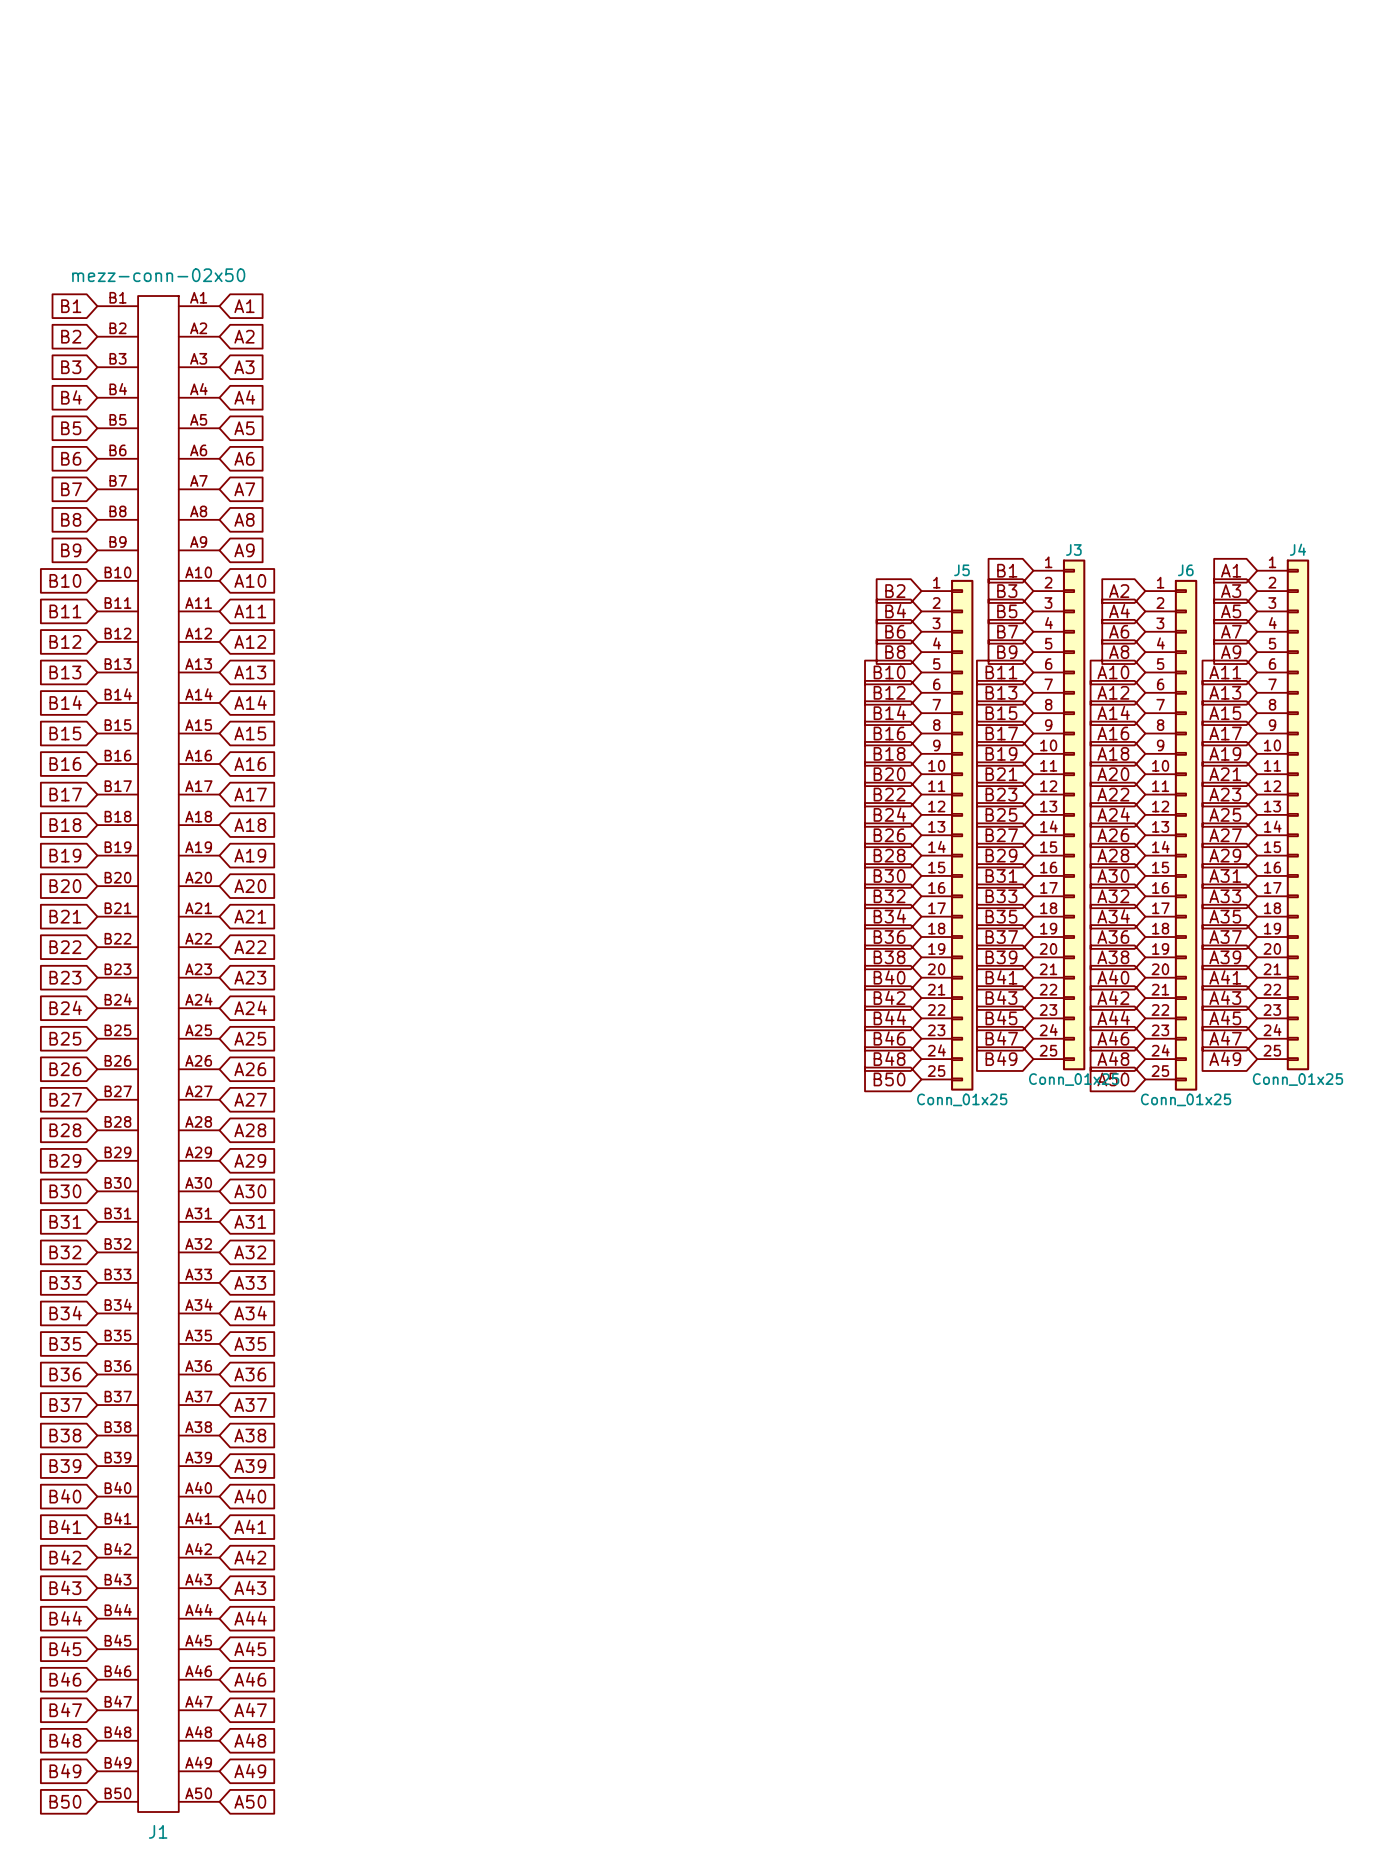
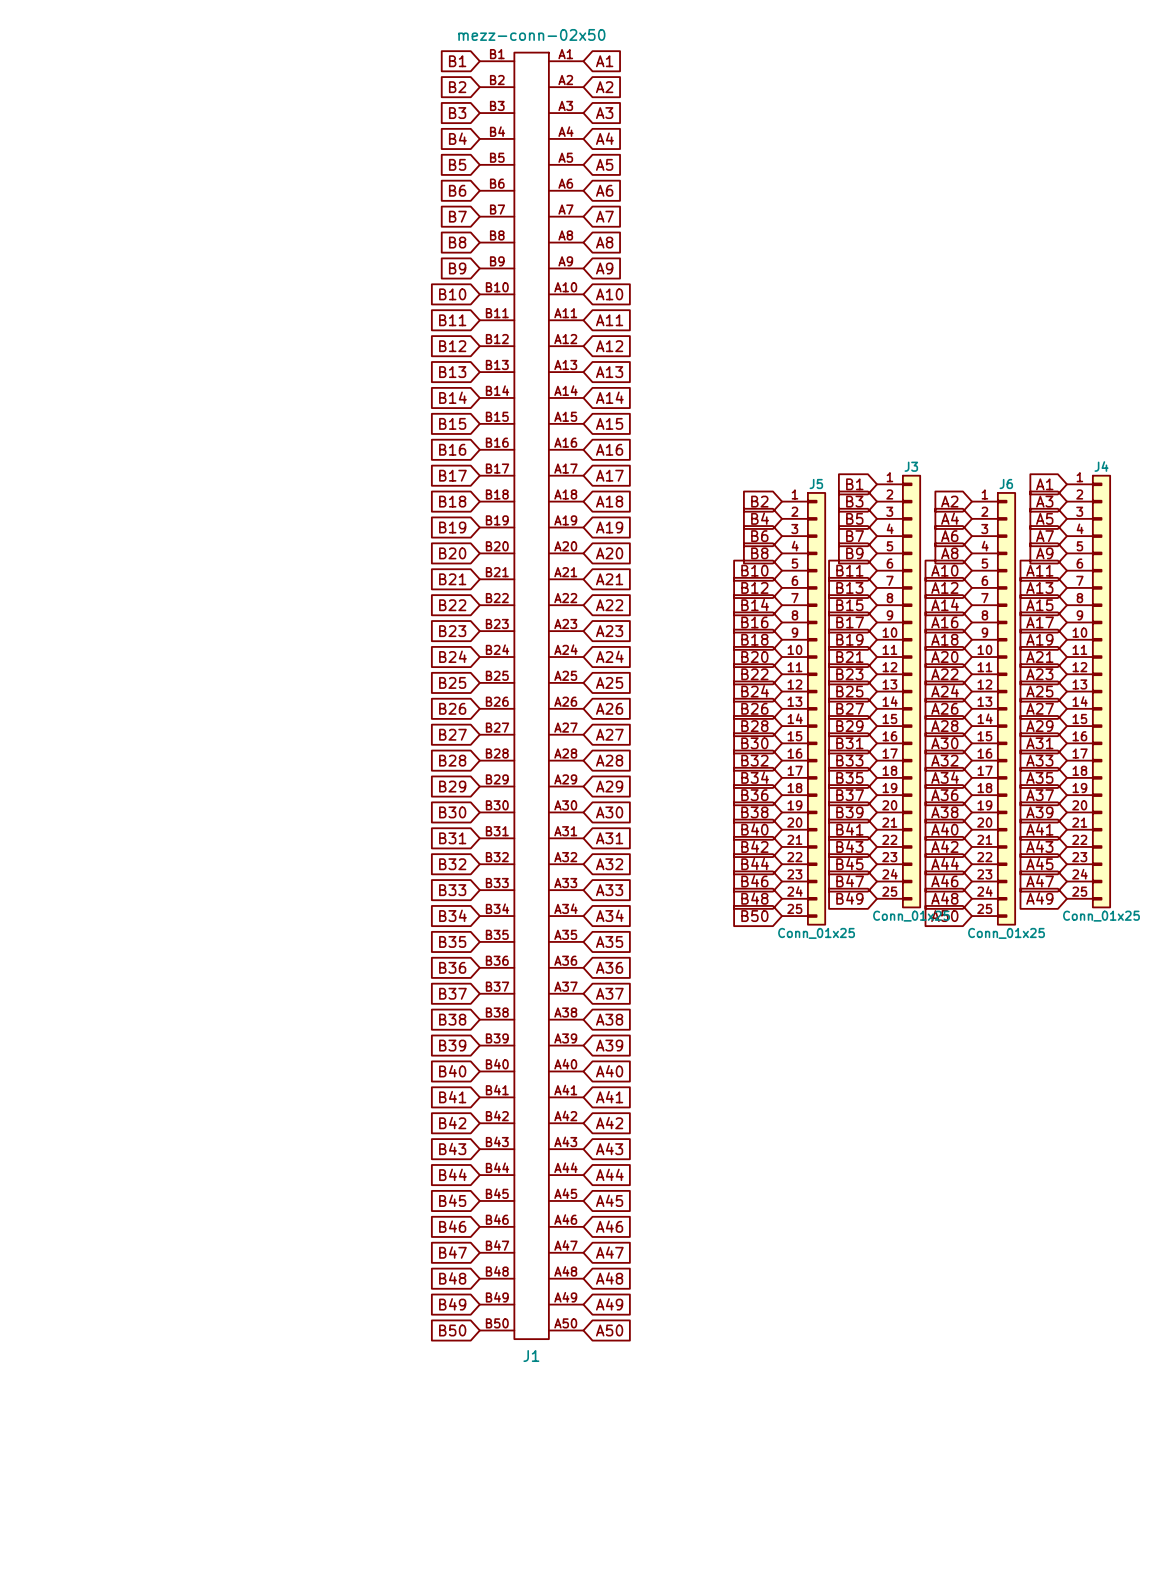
global label: none -> B1 (457, 61)
global label: none -> A1 (604, 61)
global label: none -> B2 (457, 87)
global label: none -> A2 (604, 87)
global label: none -> B3 (457, 113)
global label: none -> A3 (604, 113)
global label: none -> B4 (457, 138)
global label: none -> A4 (604, 138)
global label: none -> B5 (457, 164)
global label: none -> A5 (604, 164)
global label: none -> B6 (457, 190)
global label: none -> A6 (604, 190)
global label: none -> B7 (457, 216)
global label: none -> A7 (604, 216)
global label: none -> B8 (457, 242)
global label: none -> A8 (604, 242)
global label: B1 (71, 306) -> none
global label: A1 (244, 306) -> none
global label: none -> B9 (457, 268)
global label: none -> A9 (604, 268)
global label: B2 (71, 336) -> none
global label: A2 (244, 336) -> none
global label: none -> B10 (452, 294)
global label: none -> A10 (609, 294)
global label: B3 (71, 367) -> none
global label: A3 (244, 367) -> none
global label: none -> B11 (452, 320)
global label: none -> A11 (609, 320)
global label: B4 (71, 397) -> none
global label: A4 (244, 397) -> none
global label: none -> B12 (452, 346)
global label: none -> A12 (609, 346)
global label: B5 (71, 428) -> none
global label: A5 (244, 428) -> none
global label: none -> B13 (452, 372)
global label: none -> A13 (609, 372)
global label: B6 (71, 458) -> none
global label: A6 (244, 458) -> none
global label: none -> B14 (452, 397)
global label: none -> A14 (609, 397)
global label: B7 (71, 489) -> none
global label: A7 (244, 489) -> none
global label: none -> B15 (452, 423)
global label: none -> A15 (609, 423)
global label: B8 (71, 519) -> none
global label: A8 (244, 519) -> none
global label: none -> B16 (452, 449)
global label: none -> A16 (609, 449)
global label: B9 (71, 550) -> none
global label: A9 (244, 550) -> none
global label: none -> B17 (452, 475)
global label: none -> A17 (609, 475)
global label: B10 (65, 580) -> none
global label: A10 (250, 580) -> none
global label: none -> B18 (452, 501)
global label: none -> A18 (609, 501)
global label: B11 (65, 611) -> none
global label: A11 (250, 611) -> none
global label: none -> B19 (452, 527)
global label: none -> A19 (609, 527)
global label: B12 (65, 641) -> none
global label: A12 (250, 641) -> none
global label: none -> B20 (452, 553)
global label: none -> A20 (609, 553)
global label: B13 (65, 672) -> none
global label: A13 (250, 672) -> none
global label: none -> B21 (452, 579)
global label: none -> A21 (609, 579)
global label: B14 (65, 702) -> none
global label: A14 (250, 702) -> none
global label: none -> B22 (452, 605)
global label: none -> A22 (609, 605)
global label: B15 (65, 733) -> none
global label: A15 (250, 733) -> none
global label: none -> B23 (452, 631)
global label: none -> A23 (609, 631)
global label: B16 (65, 764) -> none
global label: A16 (250, 764) -> none
global label: none -> B24 (452, 656)
global label: none -> A24 (609, 656)
global label: B17 (65, 794) -> none
global label: A17 (250, 794) -> none
global label: none -> B25 (452, 682)
global label: none -> A25 (609, 682)
global label: B18 (65, 825) -> none
global label: A18 (250, 825) -> none
global label: none -> B26 (452, 708)
global label: none -> A26 (609, 708)
global label: B19 (65, 855) -> none
global label: A19 (250, 855) -> none
global label: none -> B27 (452, 734)
global label: none -> A27 (609, 734)
global label: B20 (65, 886) -> none
global label: A20 (250, 886) -> none
global label: none -> B28 (452, 760)
global label: none -> A28 (609, 760)
global label: B21 (65, 916) -> none
global label: A21 (250, 916) -> none
global label: none -> B29 (452, 786)
global label: none -> A29 (609, 786)
global label: B22 (65, 947) -> none
global label: A22 (250, 947) -> none
global label: none -> B30 (452, 812)
global label: none -> A30 (609, 812)
global label: B23 (65, 977) -> none
global label: A23 (250, 977) -> none
global label: none -> B31 (452, 838)
global label: none -> A31 (609, 838)
global label: B24 (65, 1007) -> none
global label: A24 (250, 1007) -> none
global label: none -> B32 (452, 864)
global label: none -> A32 (609, 864)
global label: B25 (65, 1038) -> none
global label: A25 (250, 1038) -> none
global label: none -> B33 (452, 890)
global label: none -> A33 (609, 890)
J1 position: (158, 1054) -> (531, 695)
global label: B26 (65, 1069) -> none
global label: A26 (250, 1069) -> none
global label: none -> B34 (452, 915)
global label: none -> A34 (609, 915)
global label: B27 (65, 1099) -> none
global label: A27 (250, 1099) -> none
global label: none -> B35 (452, 941)
global label: none -> A35 (609, 941)
global label: B28 (65, 1130) -> none
global label: A28 (250, 1130) -> none
global label: none -> B36 (452, 967)
global label: none -> A36 (609, 967)
global label: B29 (65, 1160) -> none
global label: A29 (250, 1160) -> none
global label: none -> B37 (452, 993)
global label: none -> A37 (609, 993)
global label: B30 (65, 1191) -> none
global label: A30 (250, 1191) -> none
global label: none -> B38 (452, 1019)
global label: none -> A38 (609, 1019)
global label: B31 (65, 1221) -> none
global label: A31 (250, 1221) -> none
global label: none -> B39 (452, 1045)
global label: none -> A39 (609, 1045)
global label: B32 (65, 1252) -> none
global label: A32 (250, 1252) -> none
global label: none -> B40 (452, 1071)
global label: none -> A40 (609, 1071)
global label: B33 (65, 1282) -> none
global label: A33 (250, 1282) -> none
global label: none -> B41 (452, 1097)
global label: none -> A41 (609, 1097)
global label: B34 (65, 1313) -> none
global label: A34 (250, 1313) -> none
global label: none -> B42 (452, 1123)
global label: none -> A42 (609, 1123)
global label: B35 (65, 1343) -> none
global label: A35 (250, 1343) -> none
global label: none -> B43 (452, 1148)
global label: none -> A43 (609, 1148)
global label: B36 (65, 1374) -> none
global label: A36 (250, 1374) -> none
global label: none -> B44 (452, 1174)
global label: none -> A44 (609, 1174)
global label: B37 (65, 1405) -> none
global label: A37 (250, 1405) -> none
global label: none -> B45 (452, 1200)
global label: none -> A45 (609, 1200)
global label: B38 (65, 1435) -> none
global label: A38 (250, 1435) -> none
global label: none -> B46 (452, 1226)
global label: none -> A46 (609, 1226)
global label: B39 (65, 1466) -> none
global label: A39 (250, 1466) -> none
global label: none -> B47 (452, 1252)
global label: none -> A47 (609, 1252)
global label: B40 (65, 1496) -> none
global label: A40 (250, 1496) -> none
global label: none -> B48 (452, 1278)
global label: none -> A48 (609, 1278)
global label: B41 (65, 1526) -> none
global label: A41 (250, 1526) -> none
global label: none -> B49 (452, 1304)
global label: none -> A49 (609, 1304)
global label: B42 (65, 1557) -> none
global label: A42 (250, 1557) -> none
global label: none -> B50 (452, 1330)
global label: none -> A50 (609, 1330)
global label: B43 (65, 1587) -> none
global label: A43 (250, 1587) -> none
global label: B44 (65, 1618) -> none
global label: A44 (250, 1618) -> none
global label: B45 (65, 1648) -> none
global label: A45 (250, 1648) -> none
global label: B46 (65, 1679) -> none
global label: A46 (250, 1679) -> none
global label: B47 (65, 1709) -> none
global label: A47 (250, 1709) -> none
global label: B48 (65, 1740) -> none
global label: A48 (250, 1740) -> none
global label: B49 (65, 1771) -> none
global label: A49 (250, 1771) -> none
global label: B50 (65, 1801) -> none
global label: A50 (250, 1801) -> none

